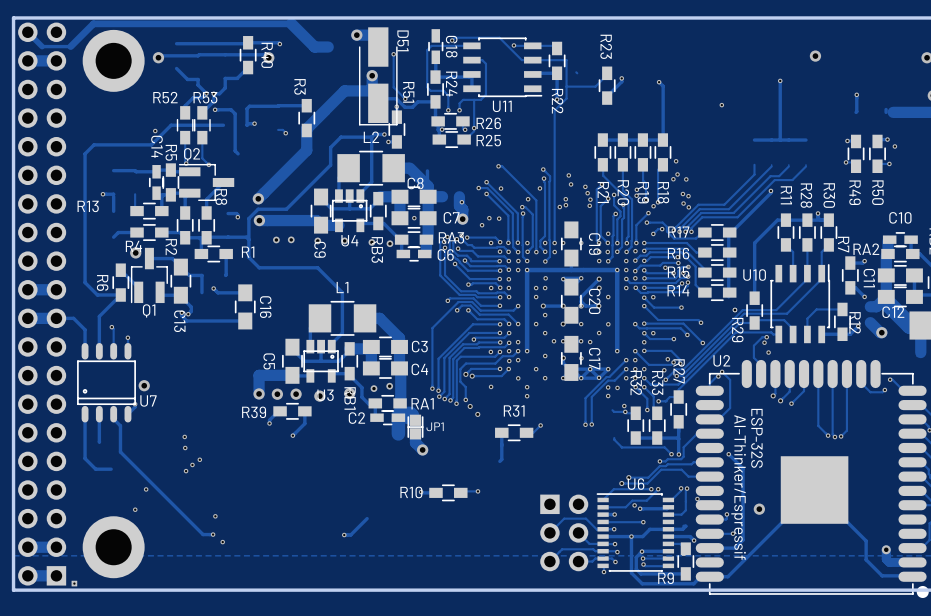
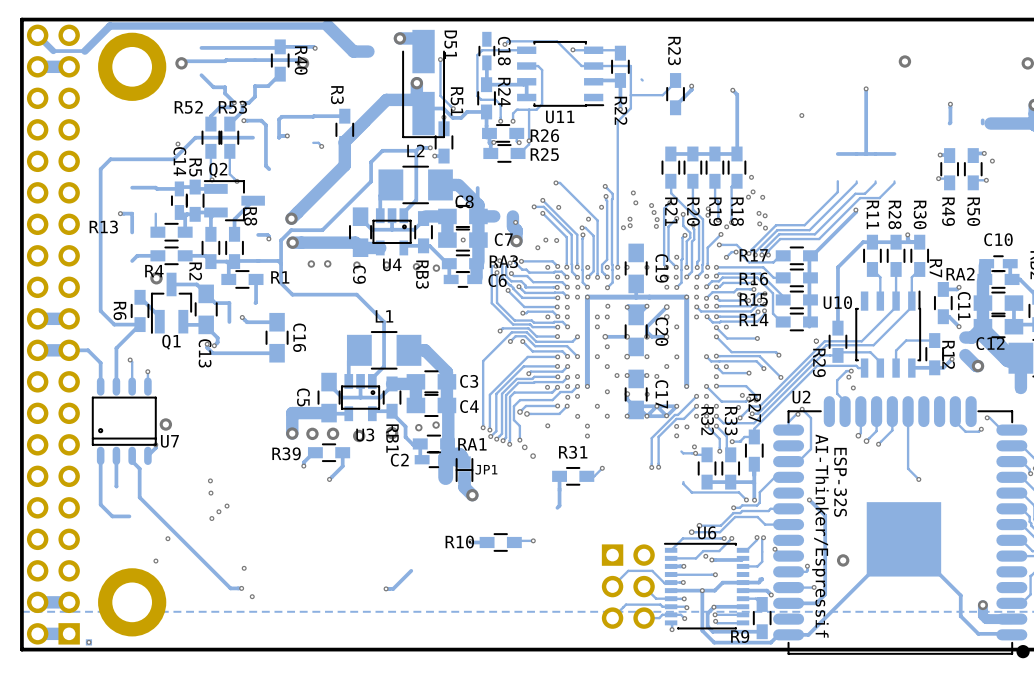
track: (832, 374) (832, 434) (834, 437) -> none
track: (846, 374) (846, 430) (841, 436) -> none
via: (841, 436) -> none
via: (834, 437) -> none

